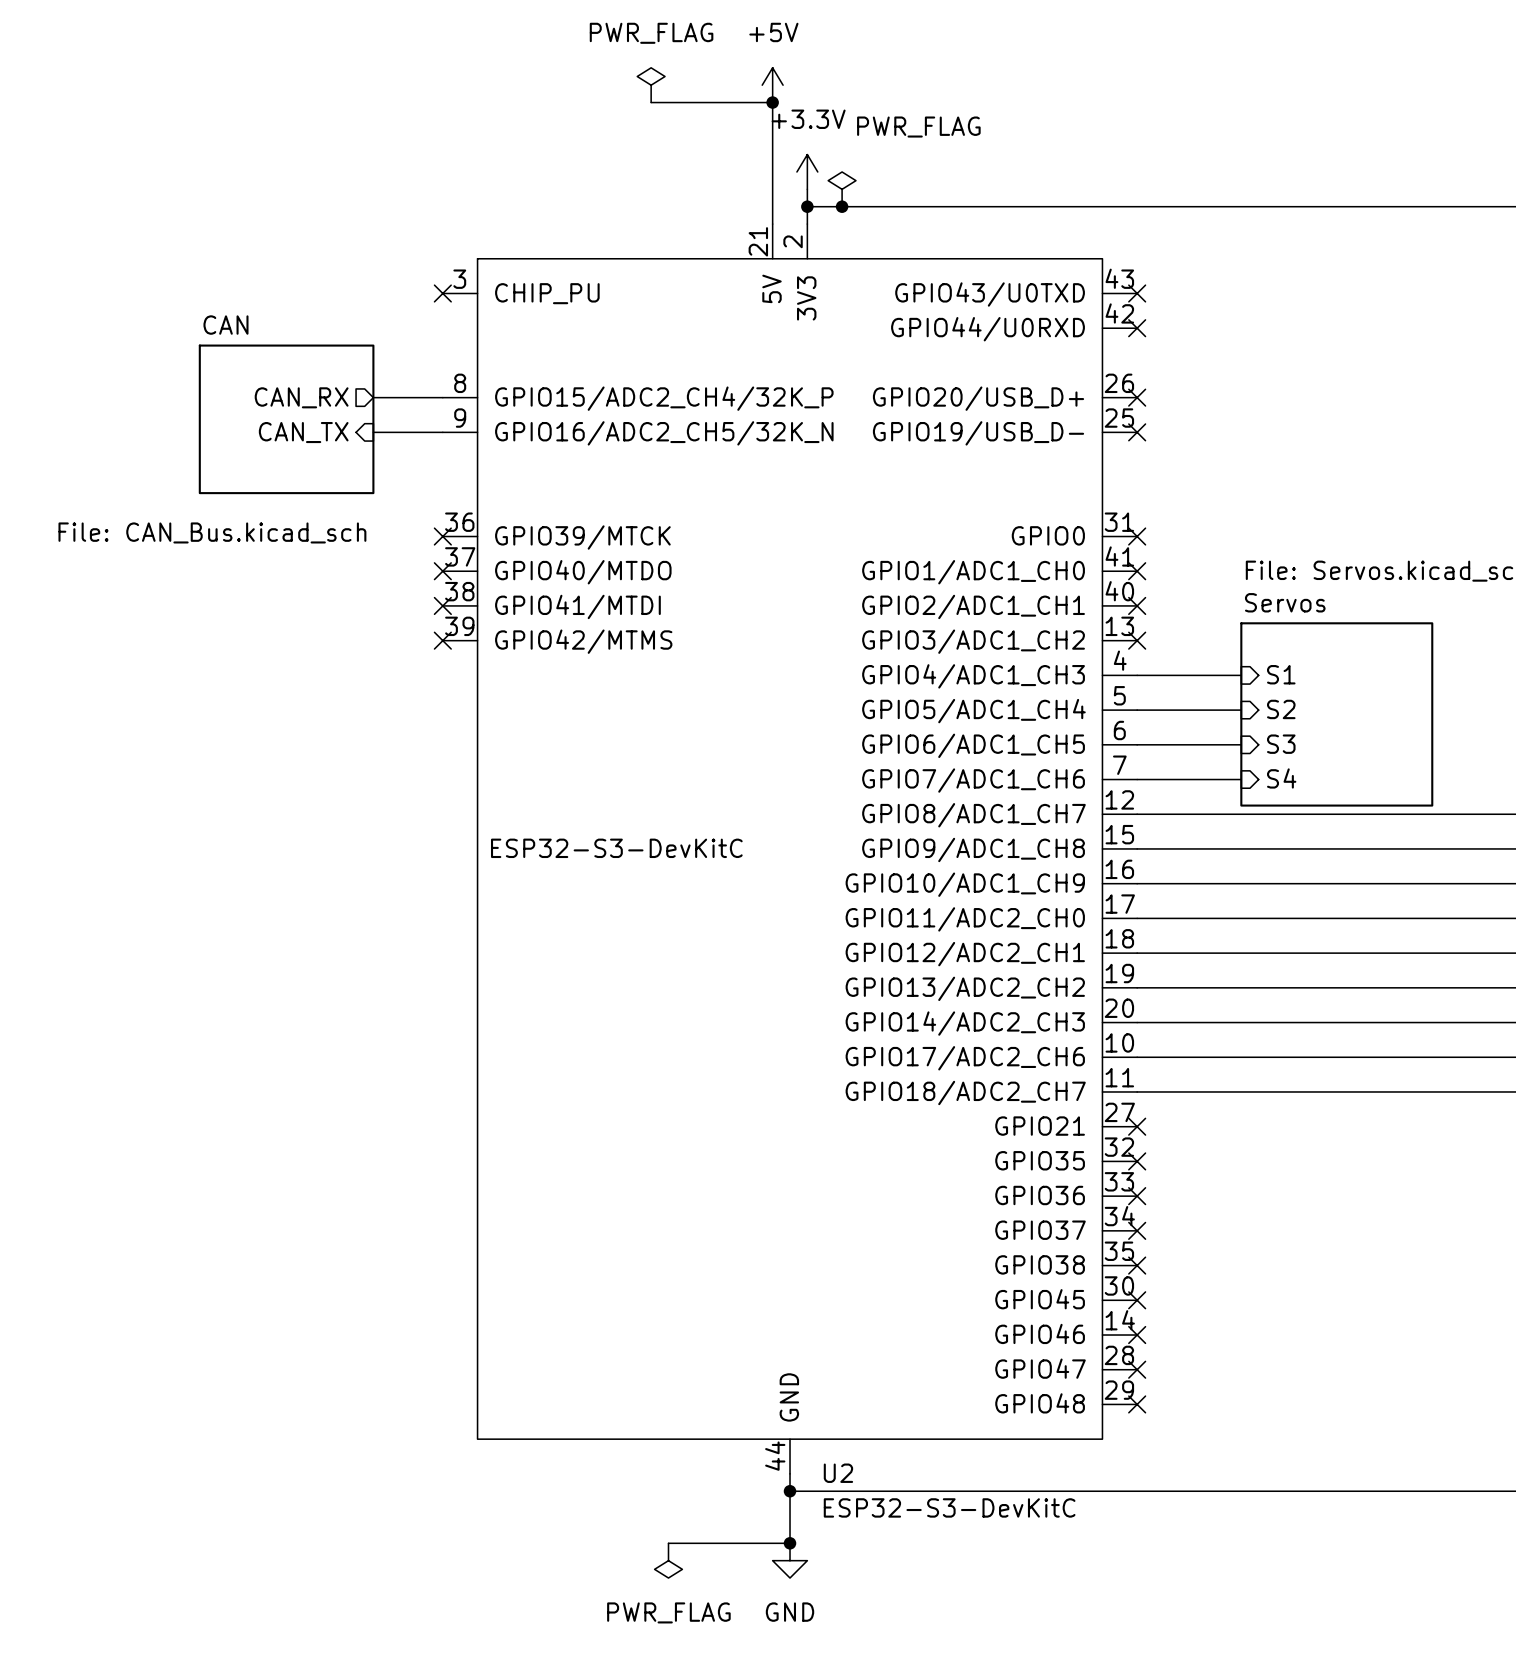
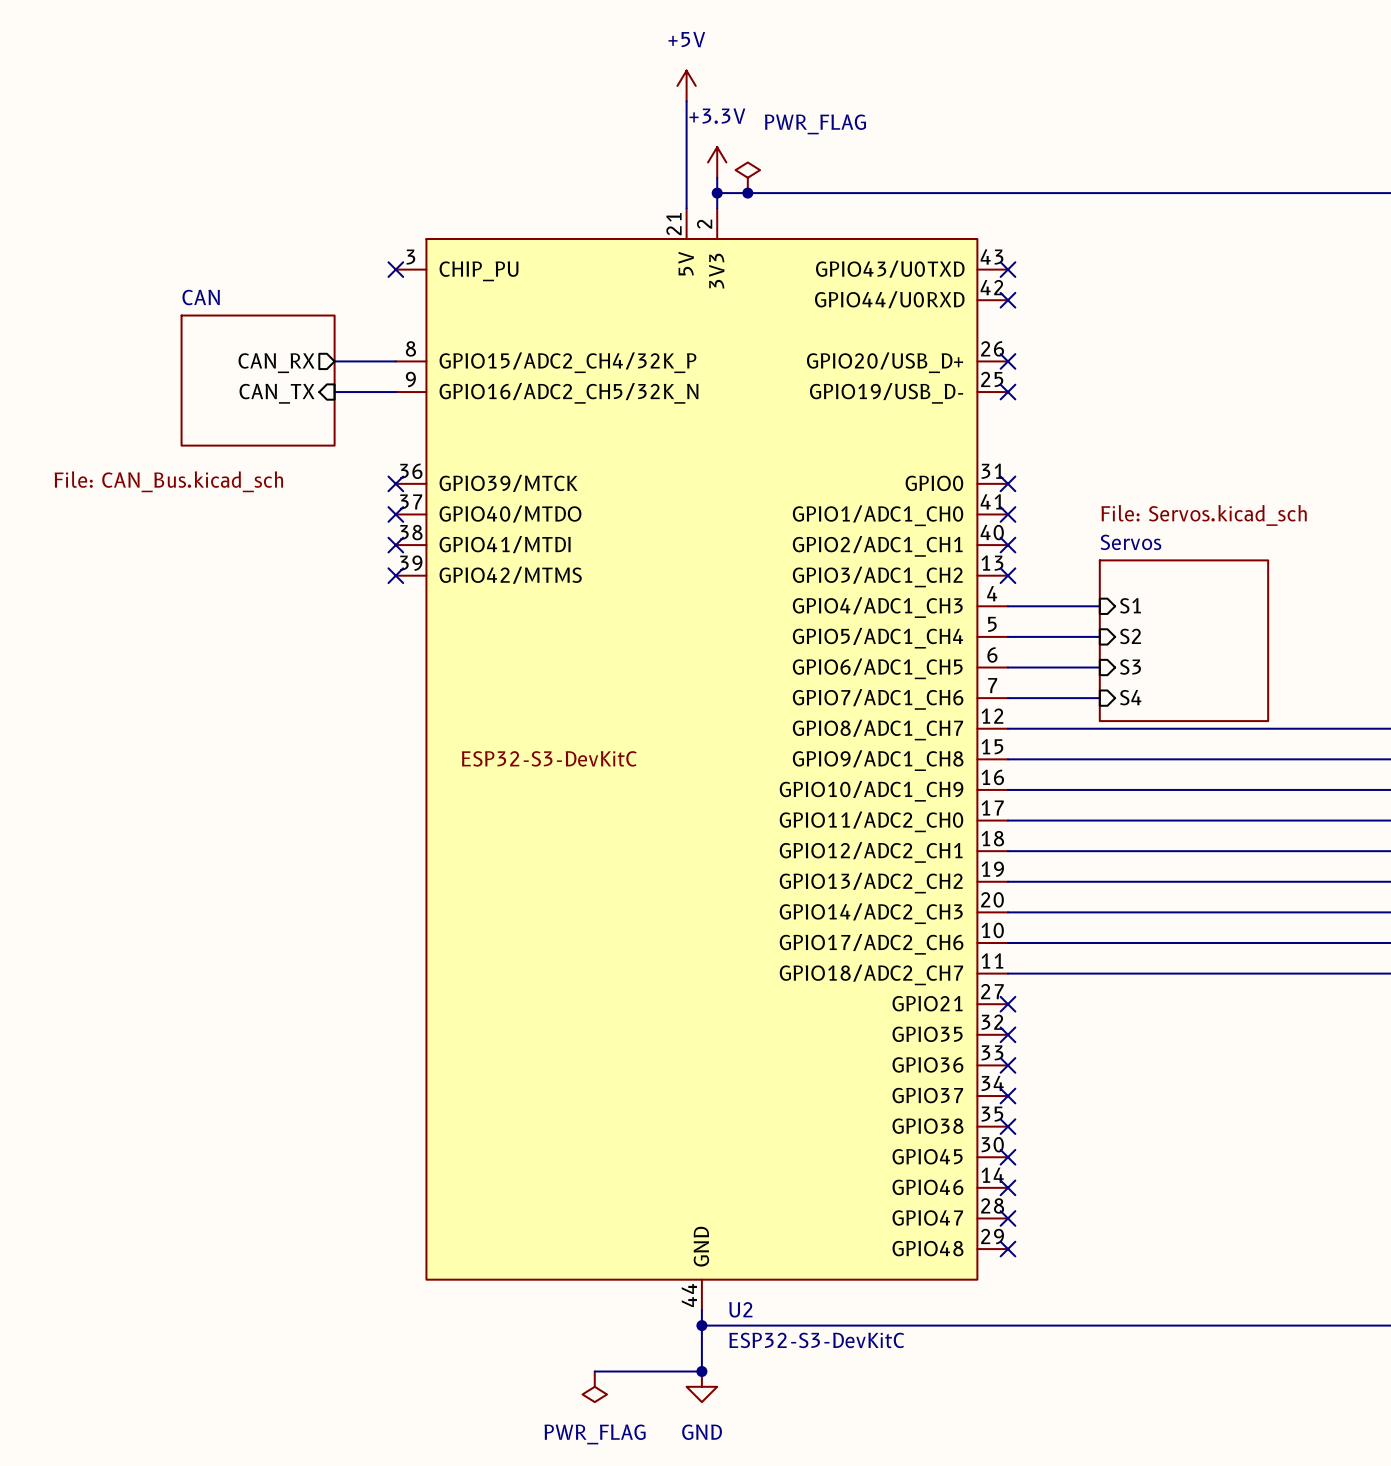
power symbol: PWR_FLAG (651, 85) -> none
wire: (651, 102) (772, 102) -> none
junction: (772, 102) -> none

